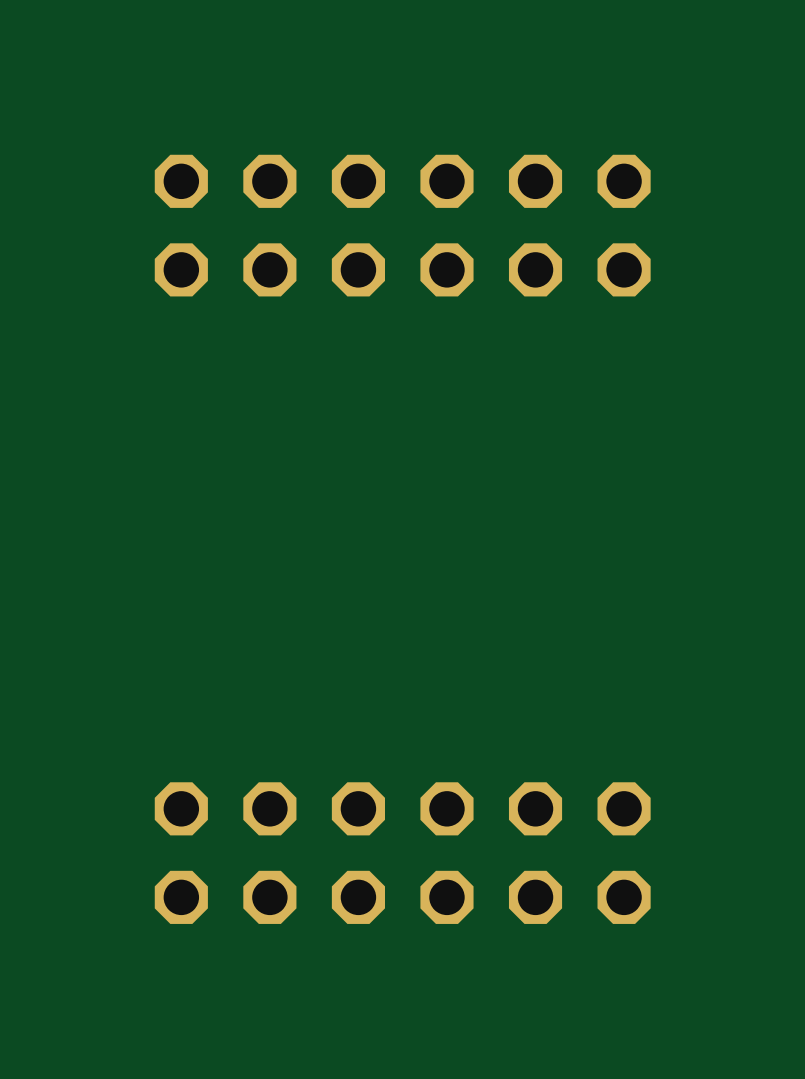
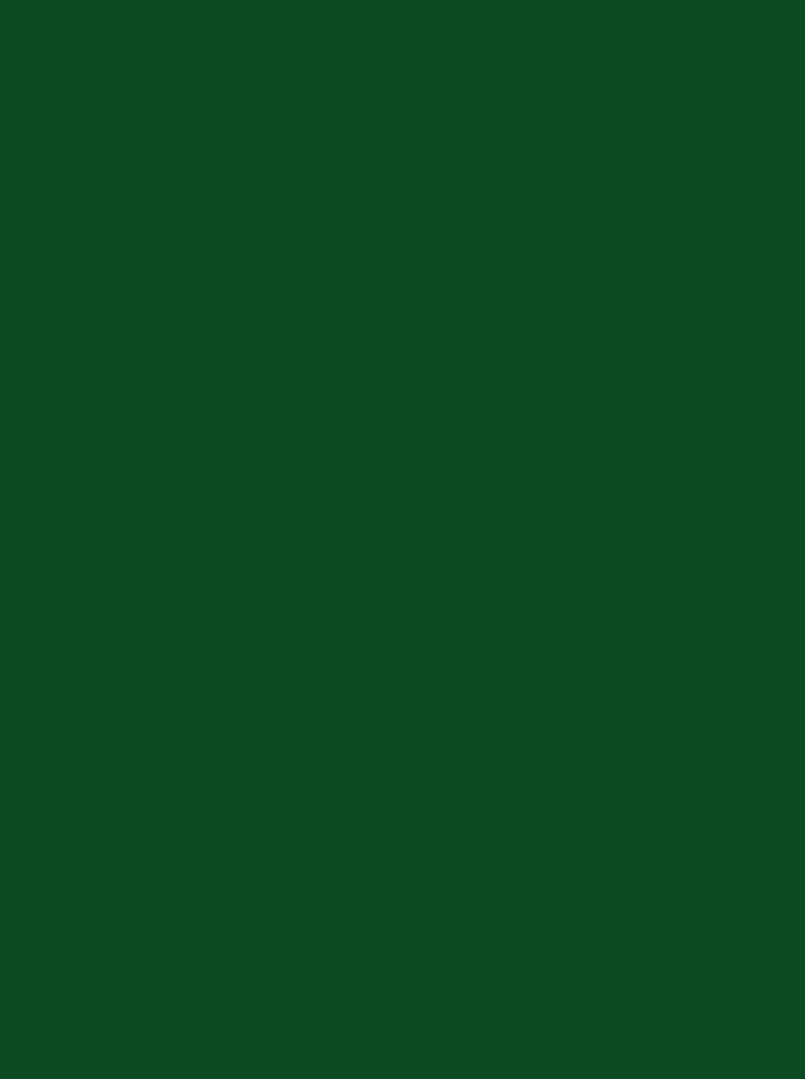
part: (402, 225) -> none
part: (402, 853) -> none

